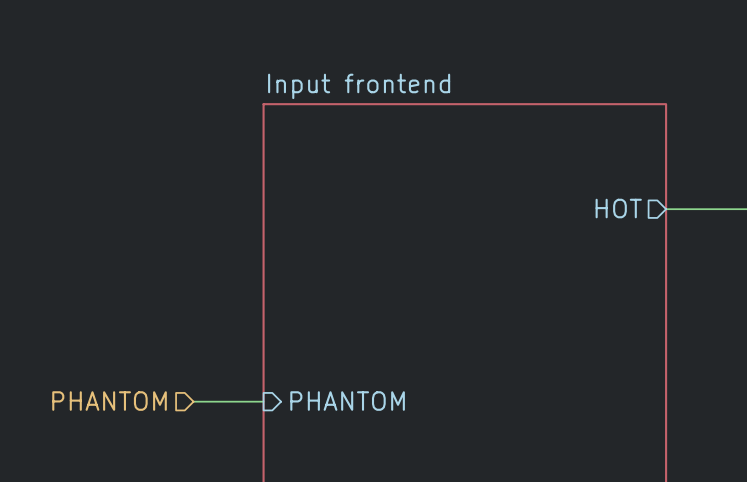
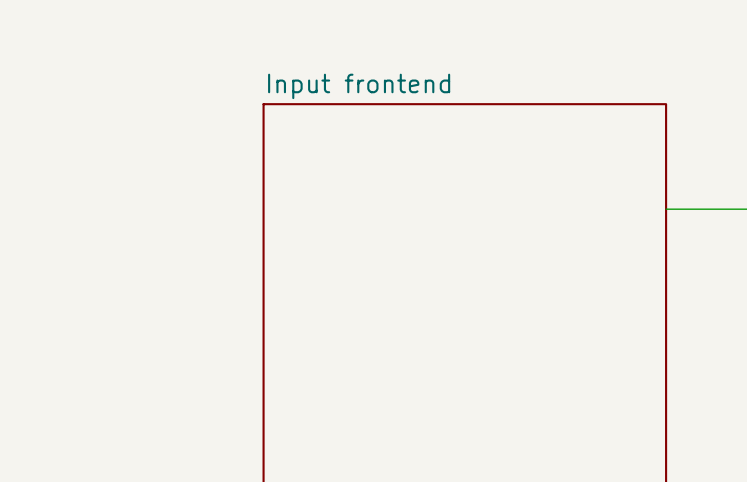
sheet pin: HOT (618, 208) -> none
hierarchical label: PHANTOM (109, 401) -> none
wire: (193, 401) (263, 401) -> none
sheet pin: PHANTOM (347, 401) -> none

